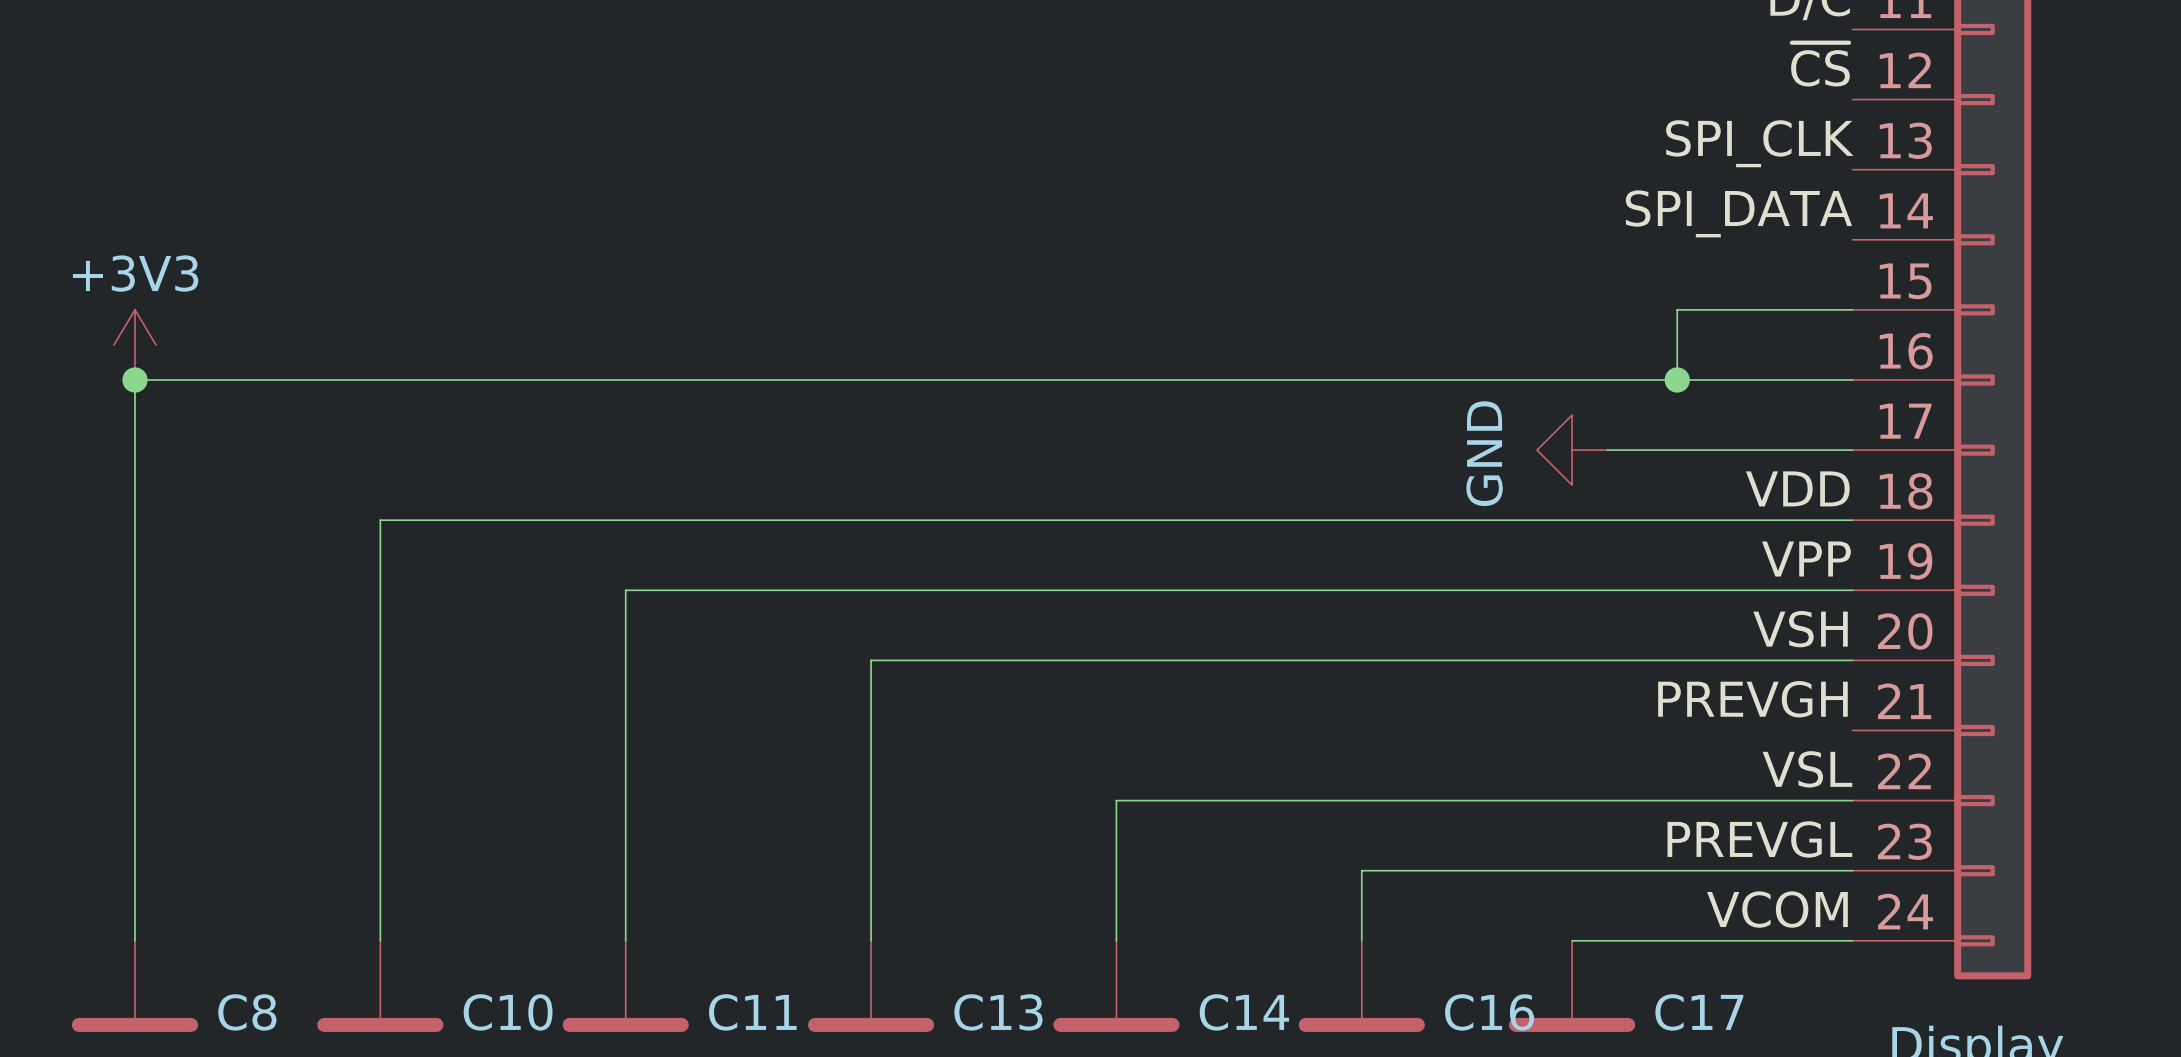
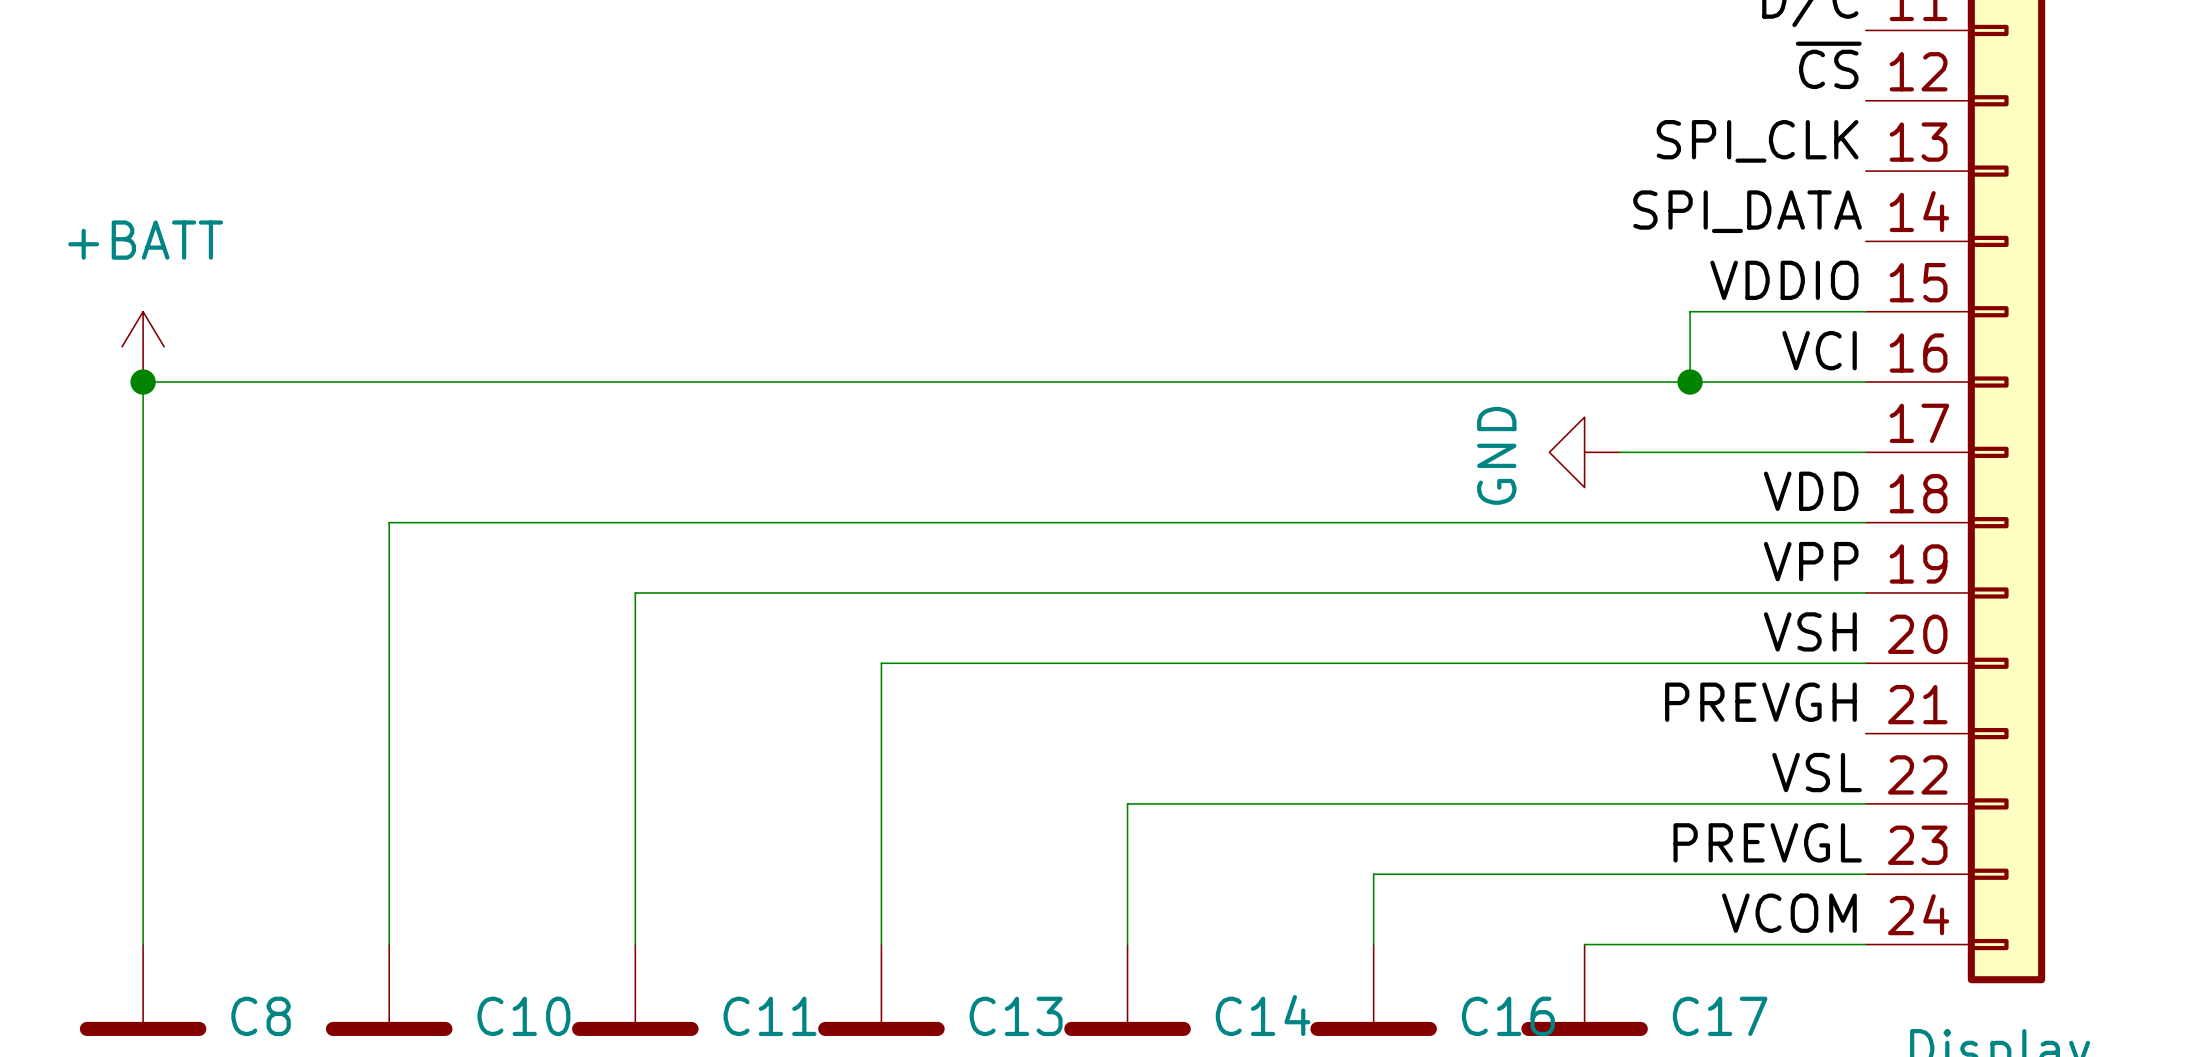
label: none -> VDDIO (1784, 280)
power symbol: +3V3 (134, 344) -> +BATT (143, 346)
label: none -> VCI (1819, 350)

